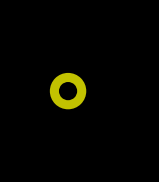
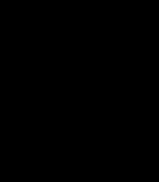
part: (68, 91) -> none

